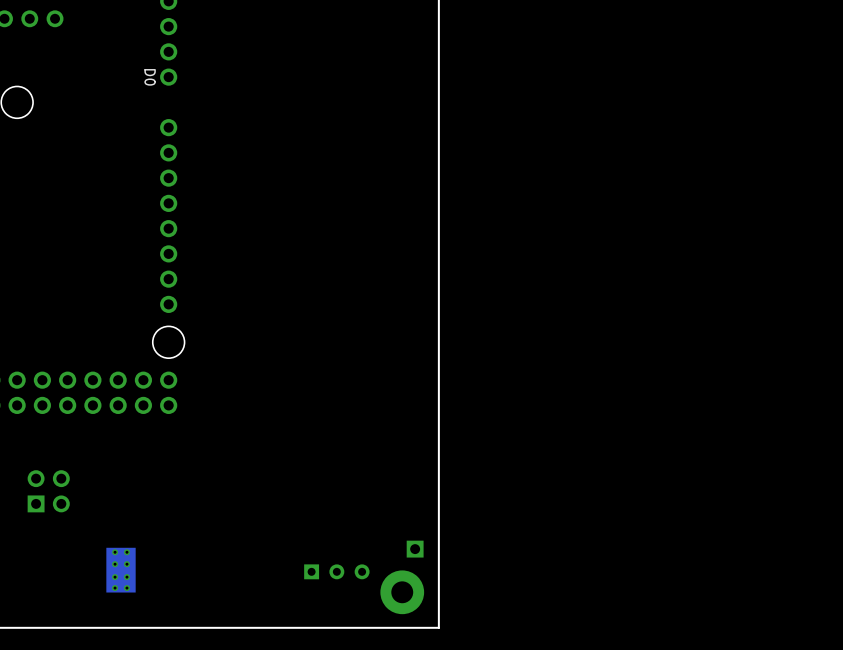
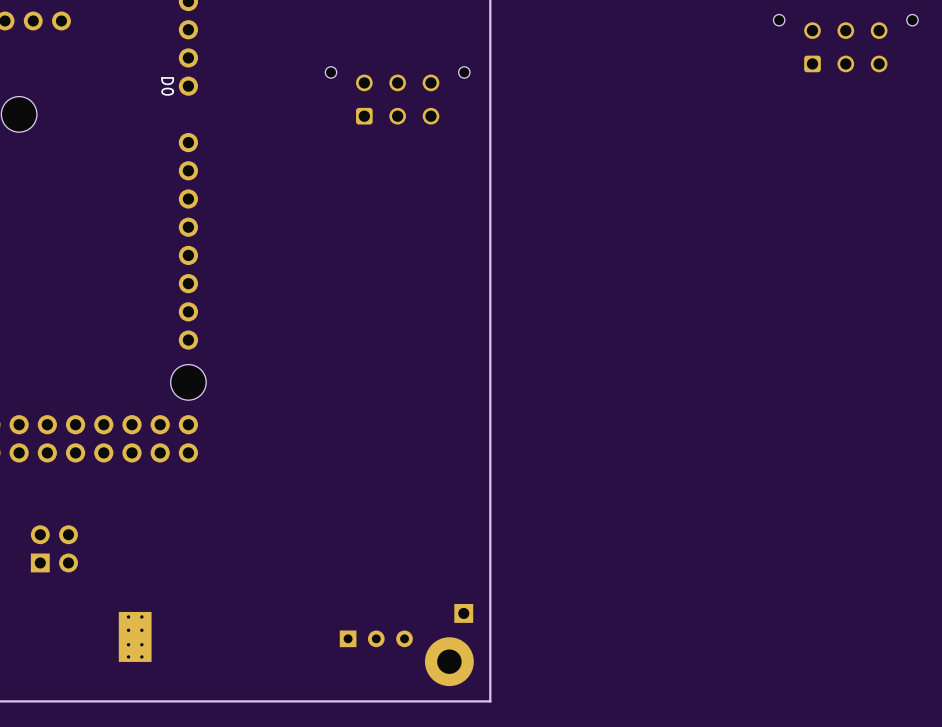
part: none -> (845, 43)
part: none -> (397, 95)

